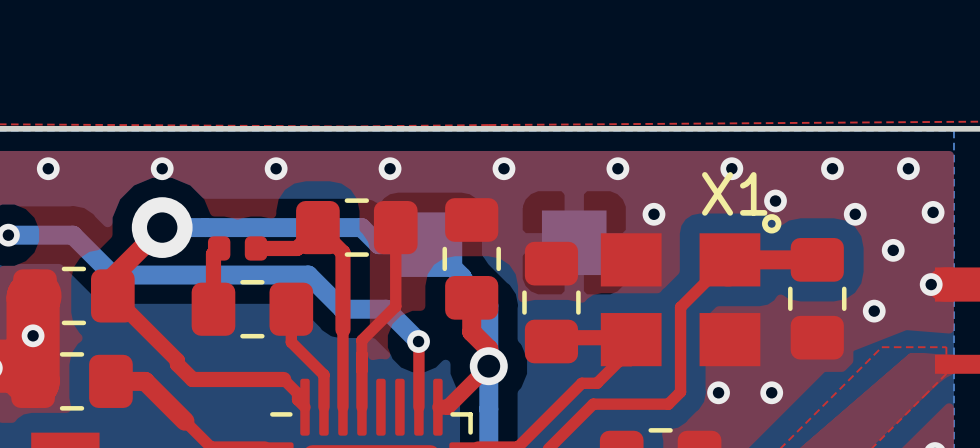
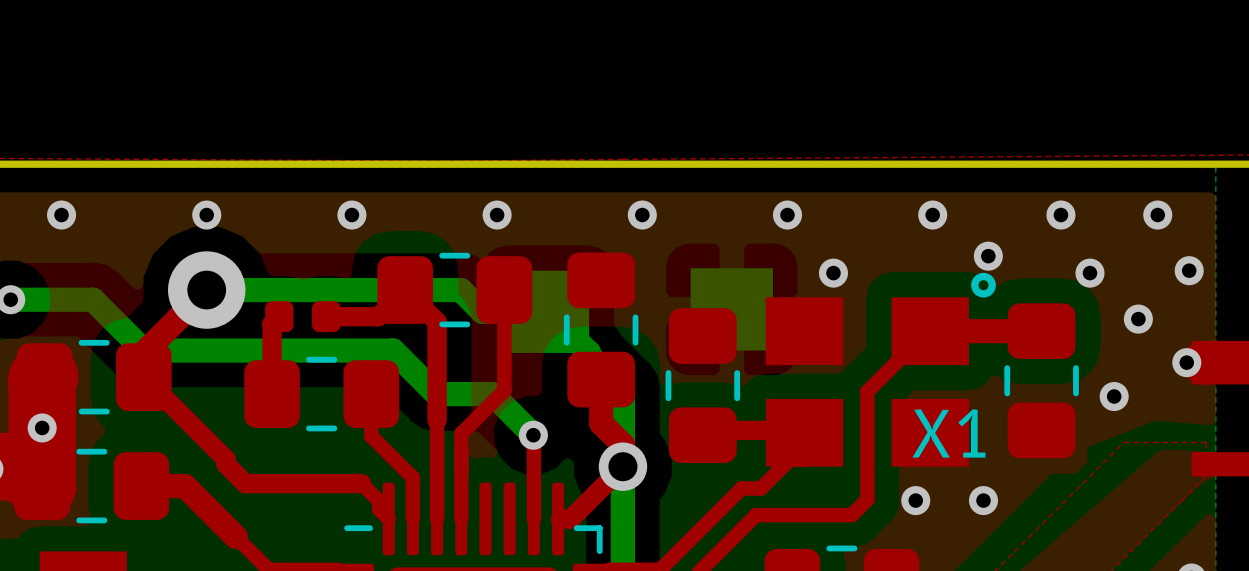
X1 name position: X1 (734, 193) -> X1 (948, 433)

